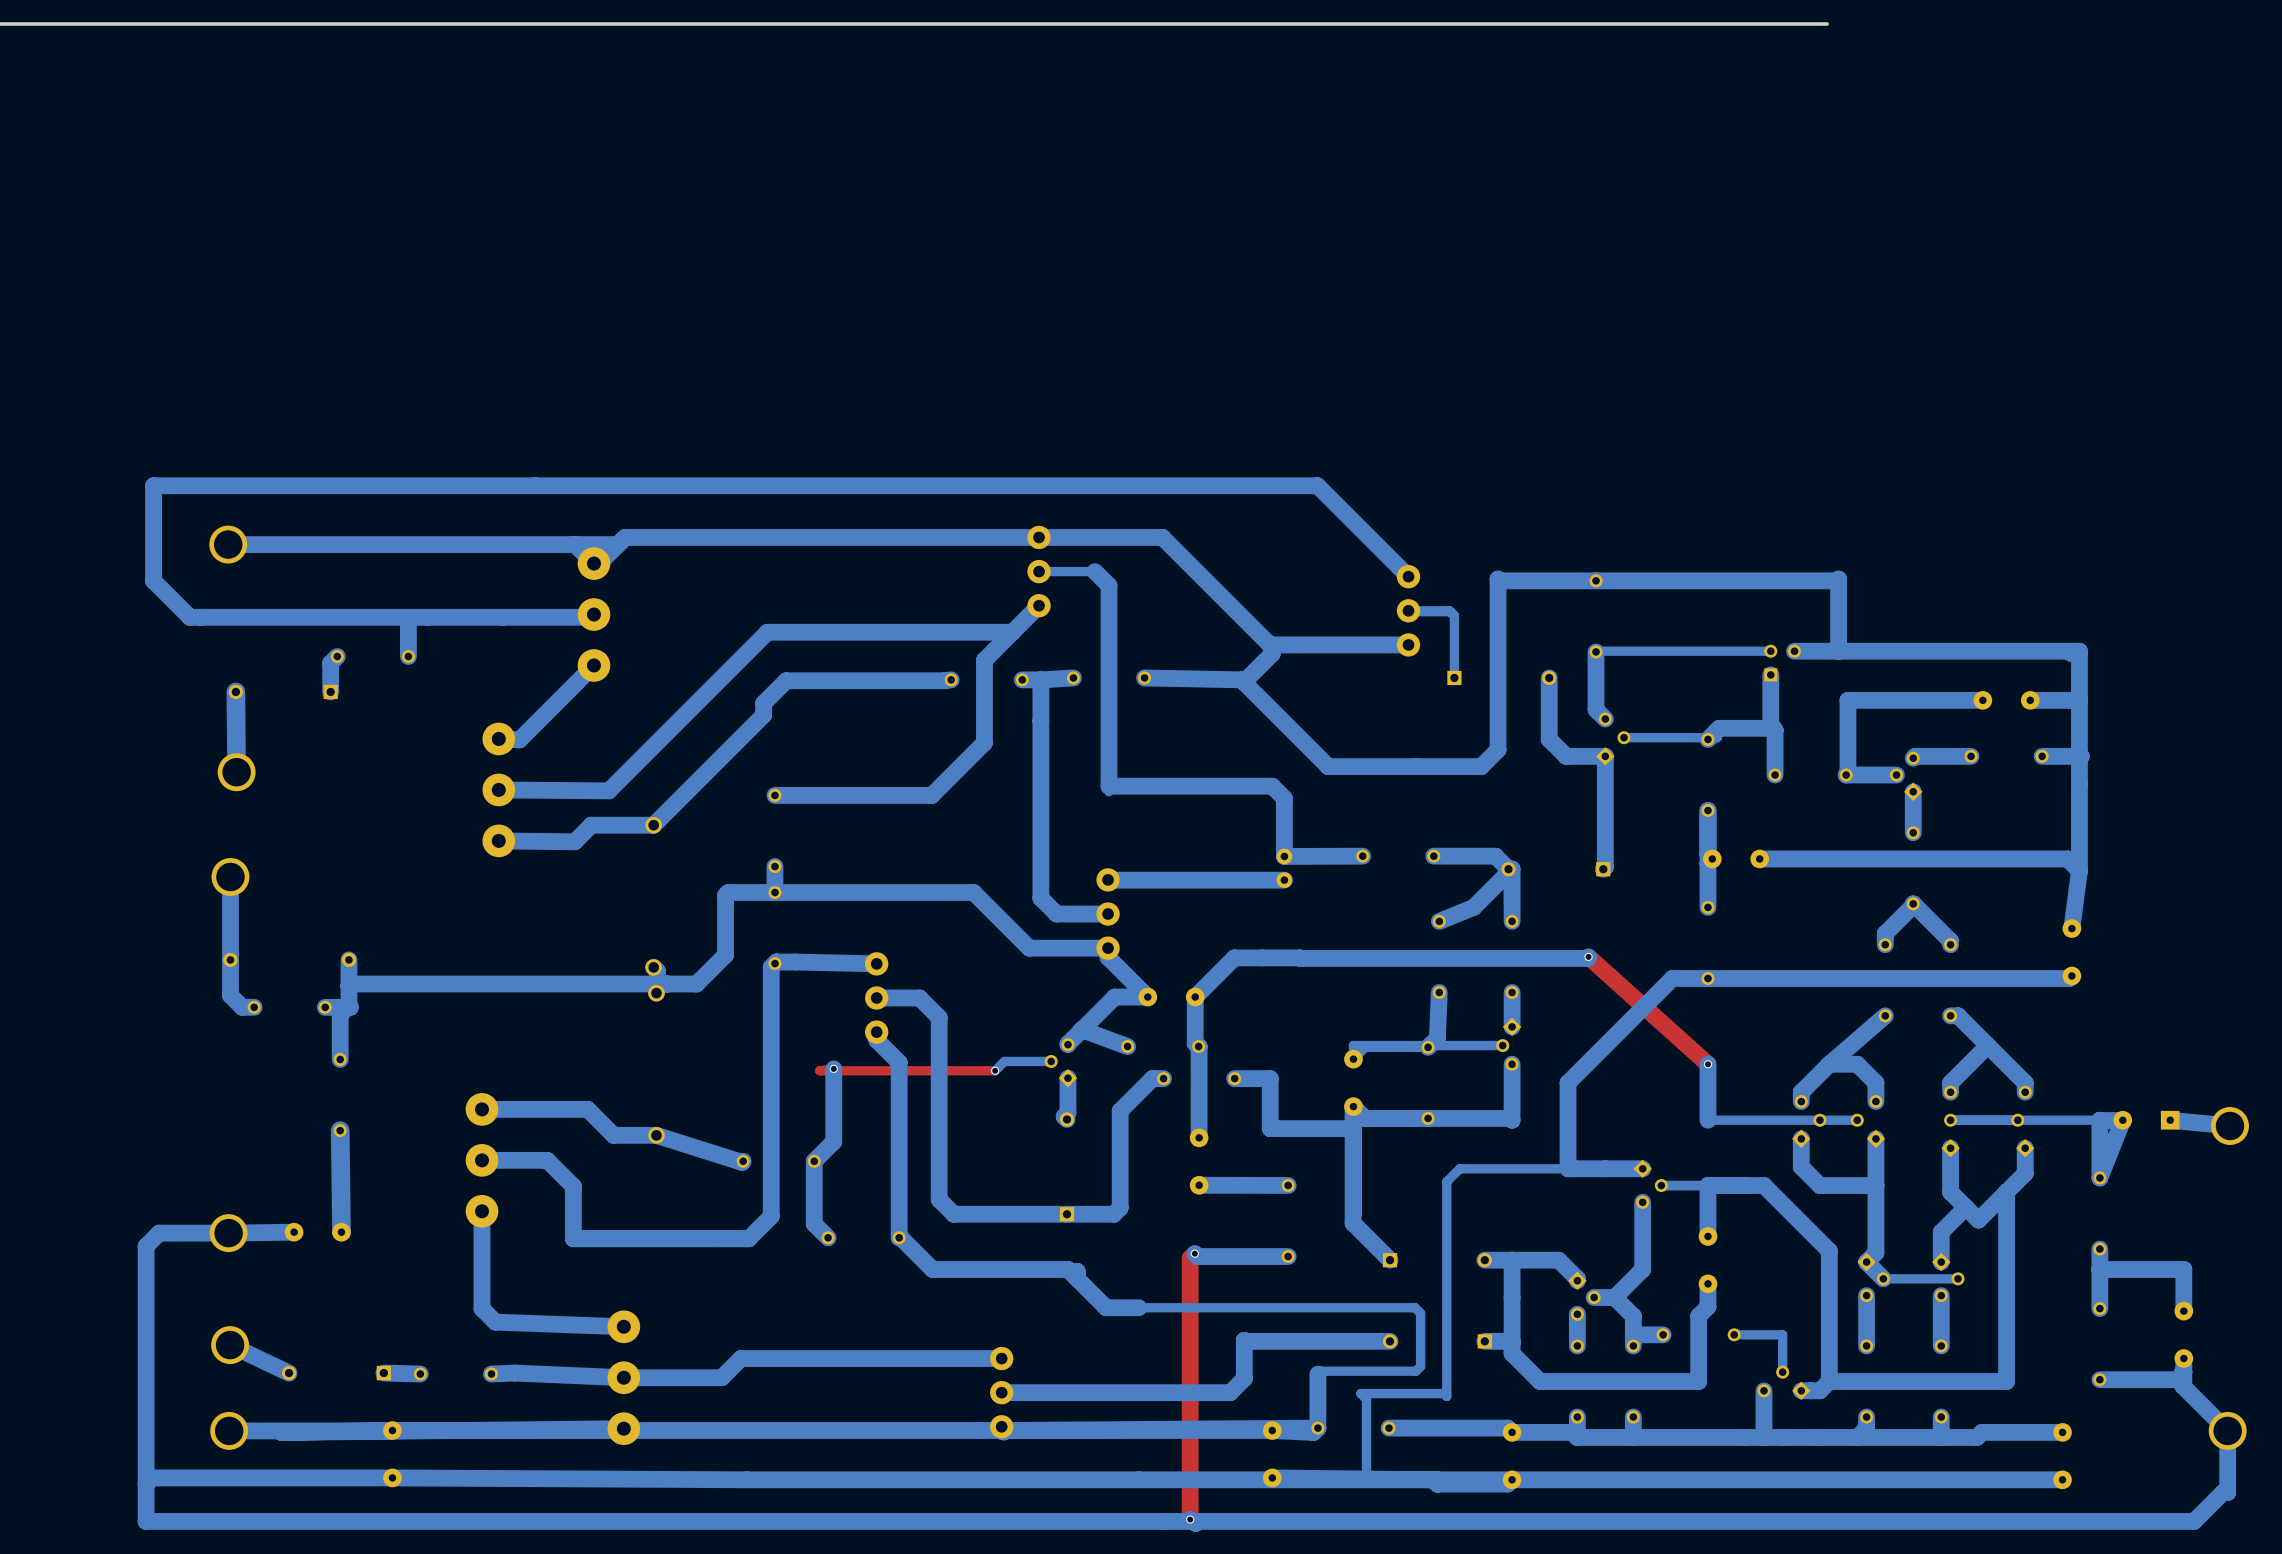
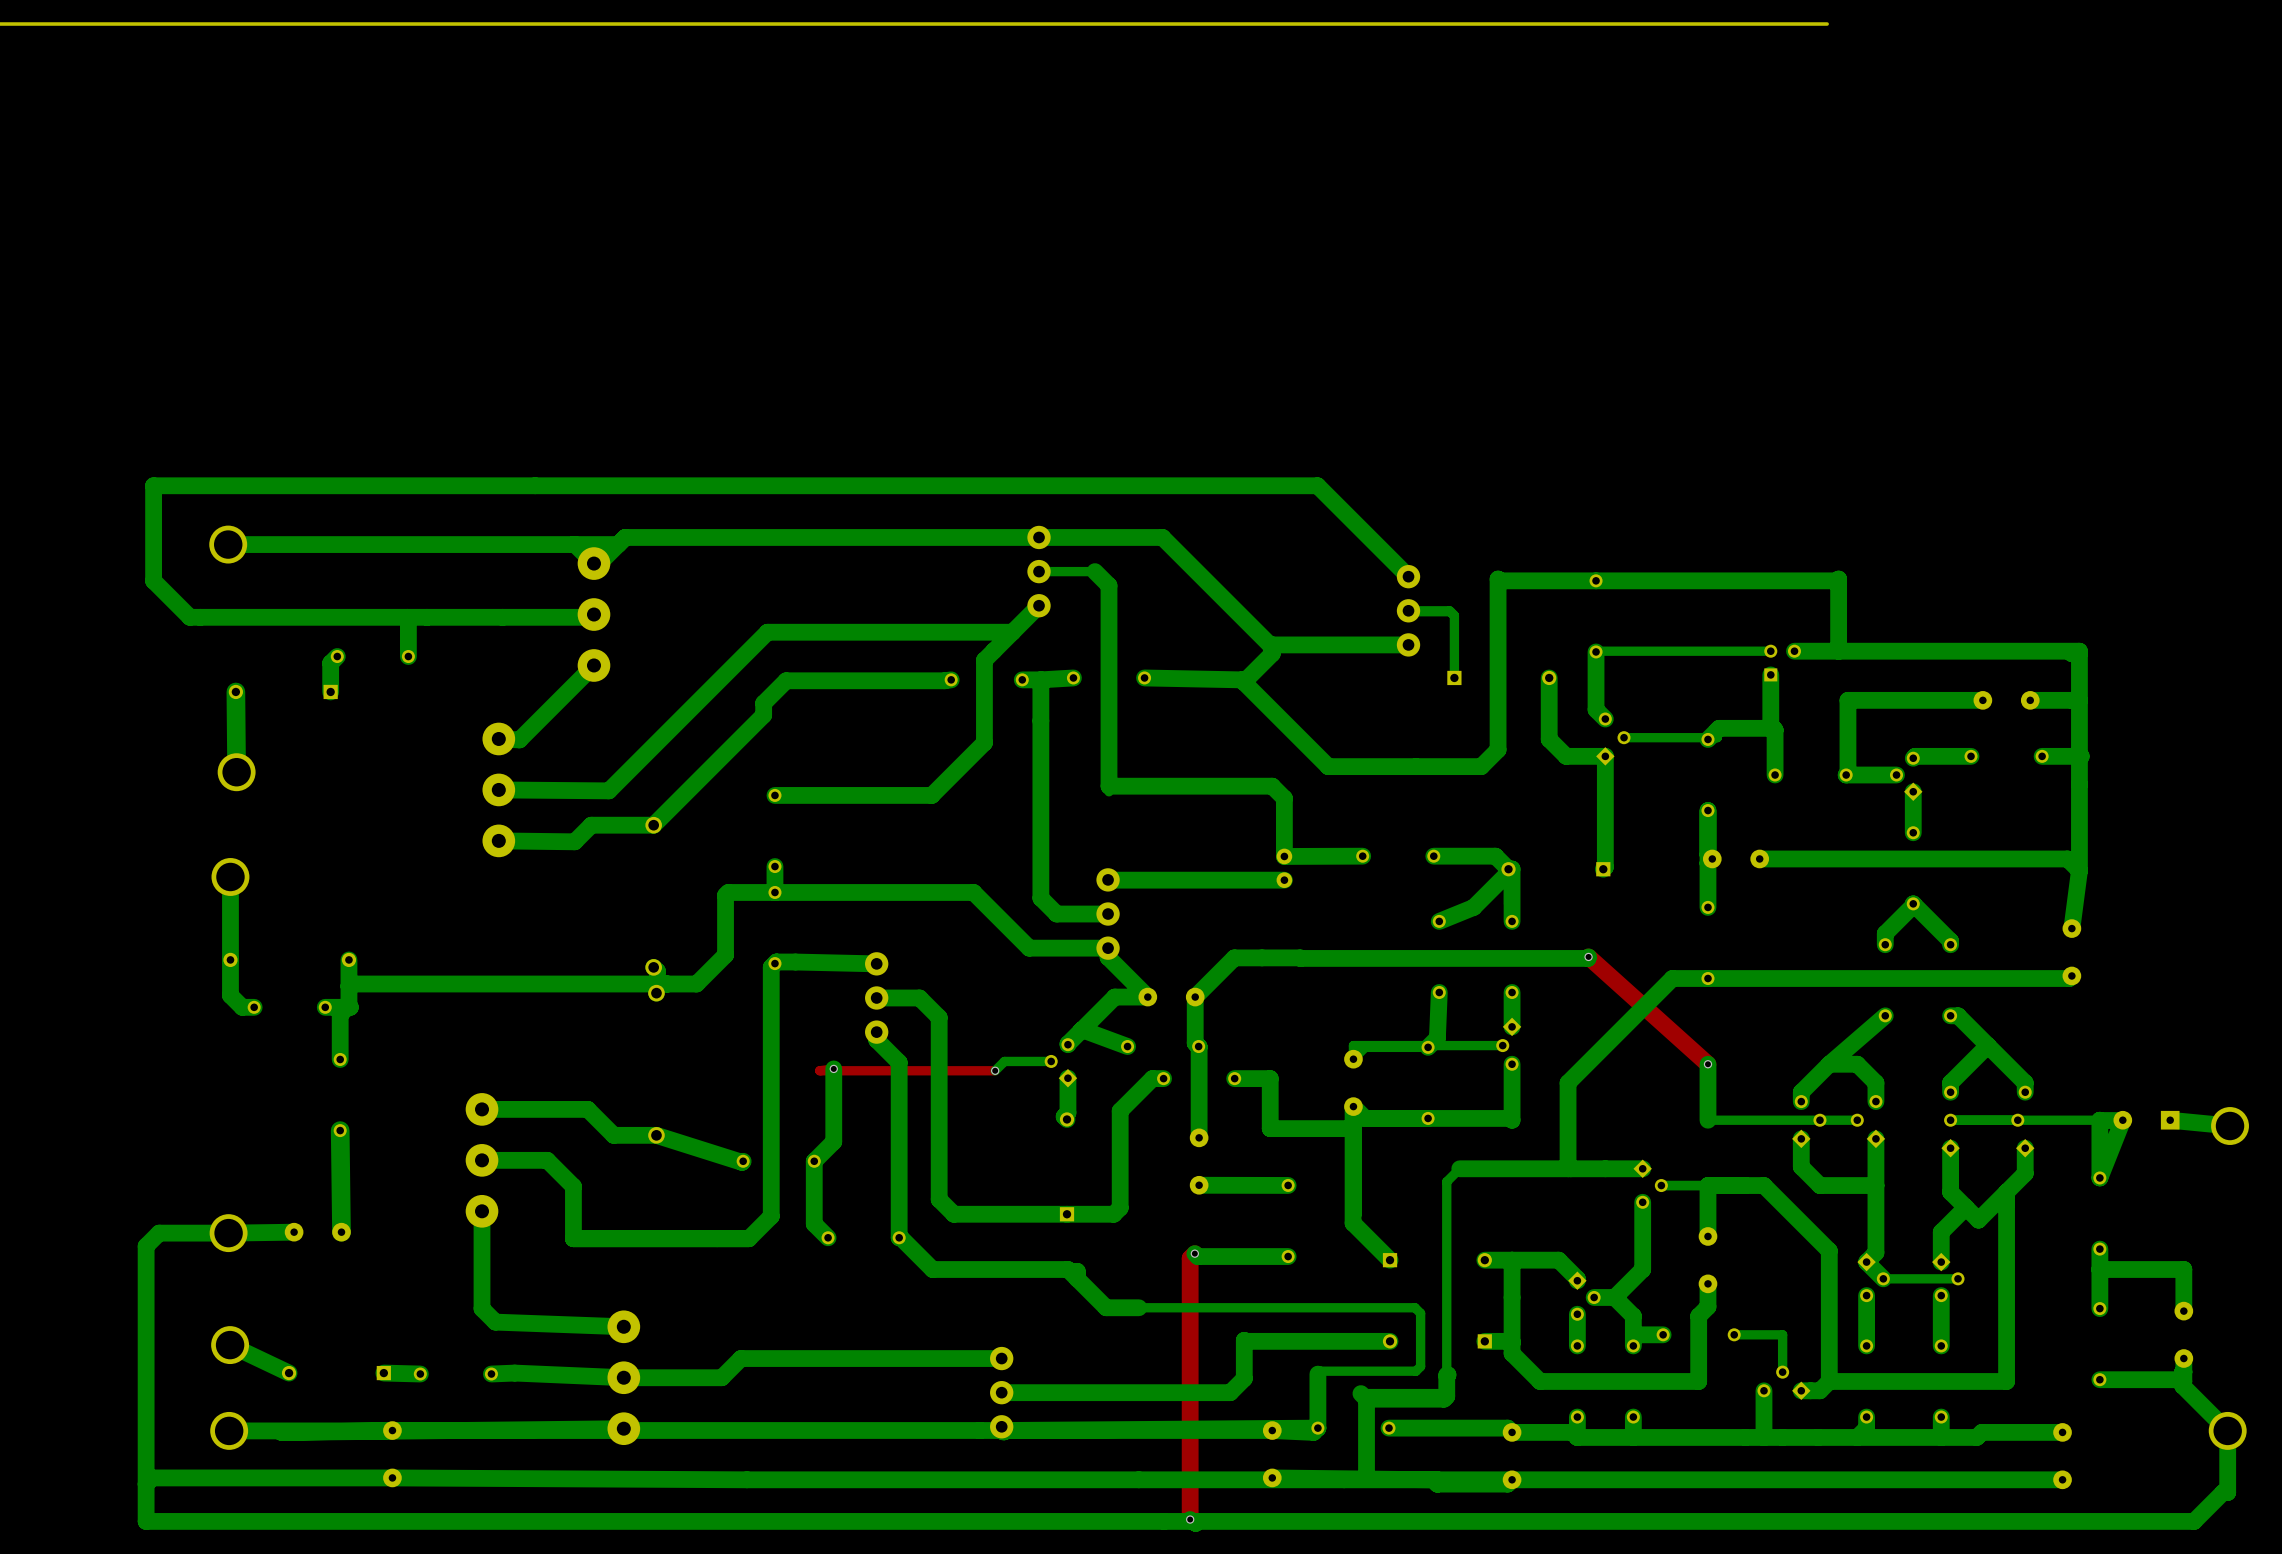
bottom track width: thin (1566, 1168) (1459, 1168) -> thick (1566, 1168) (1459, 1168)
bottom track: none -> (1446, 1374) (1446, 1396) (1443, 1399) (1366, 1399) (1360, 1393)
bottom track width: thin (1366, 1399) (1366, 1479) -> thick (1366, 1399) (1366, 1479)

